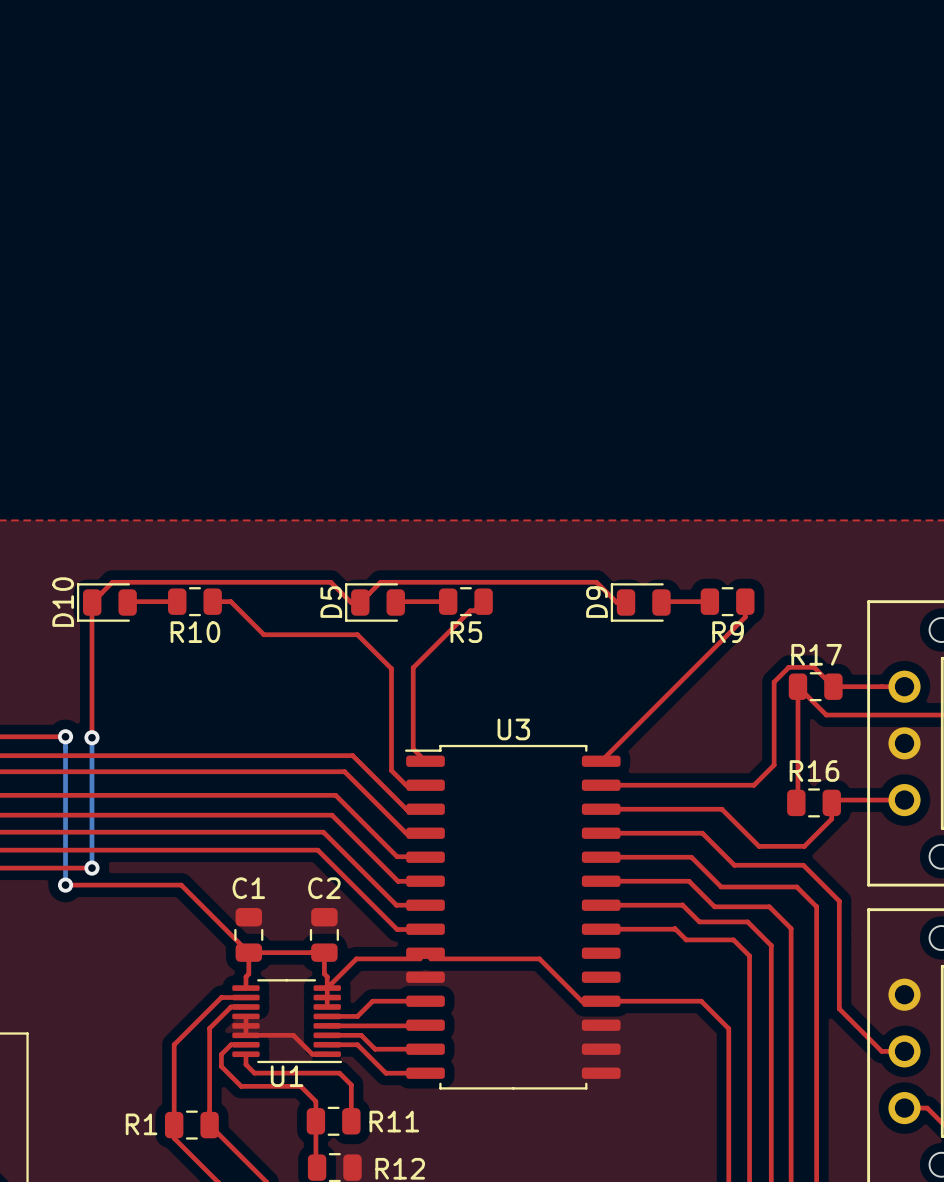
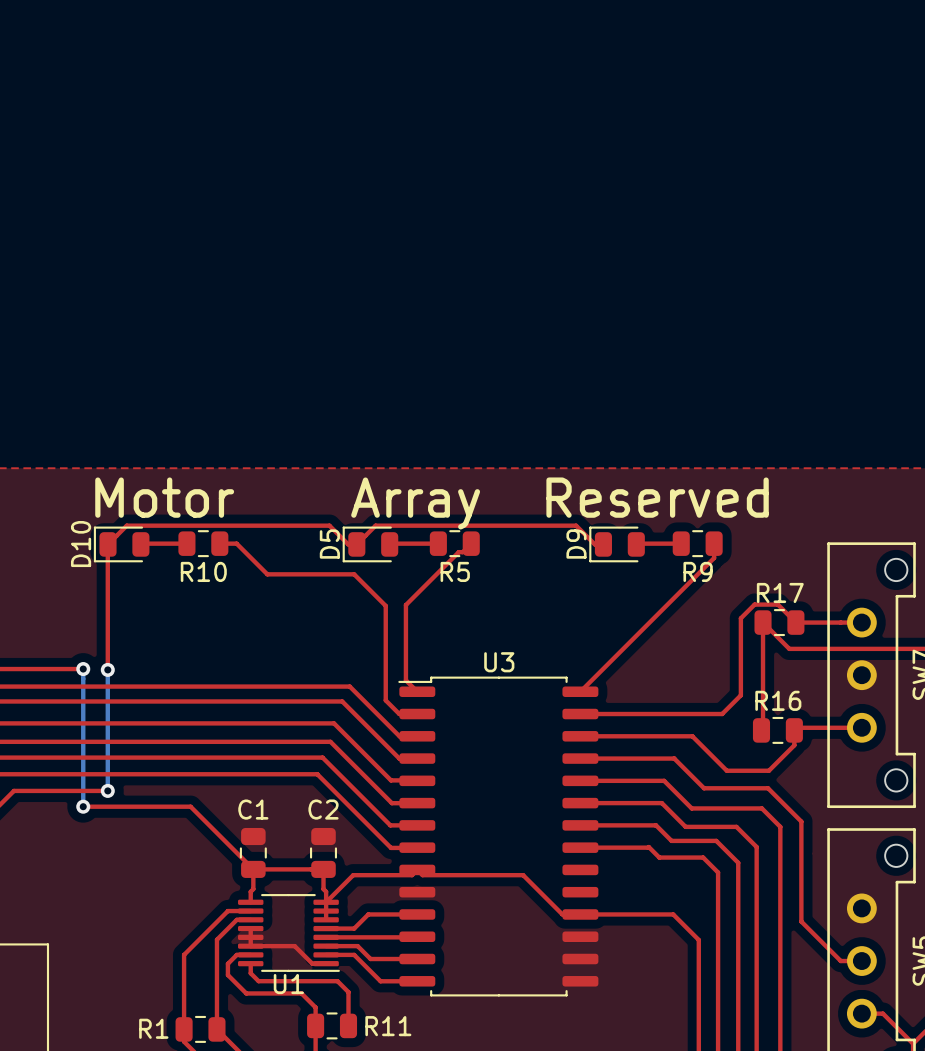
text: none -> Motor (164, 497)
text: none -> Reserved (657, 497)
text: none -> Array (415, 503)

